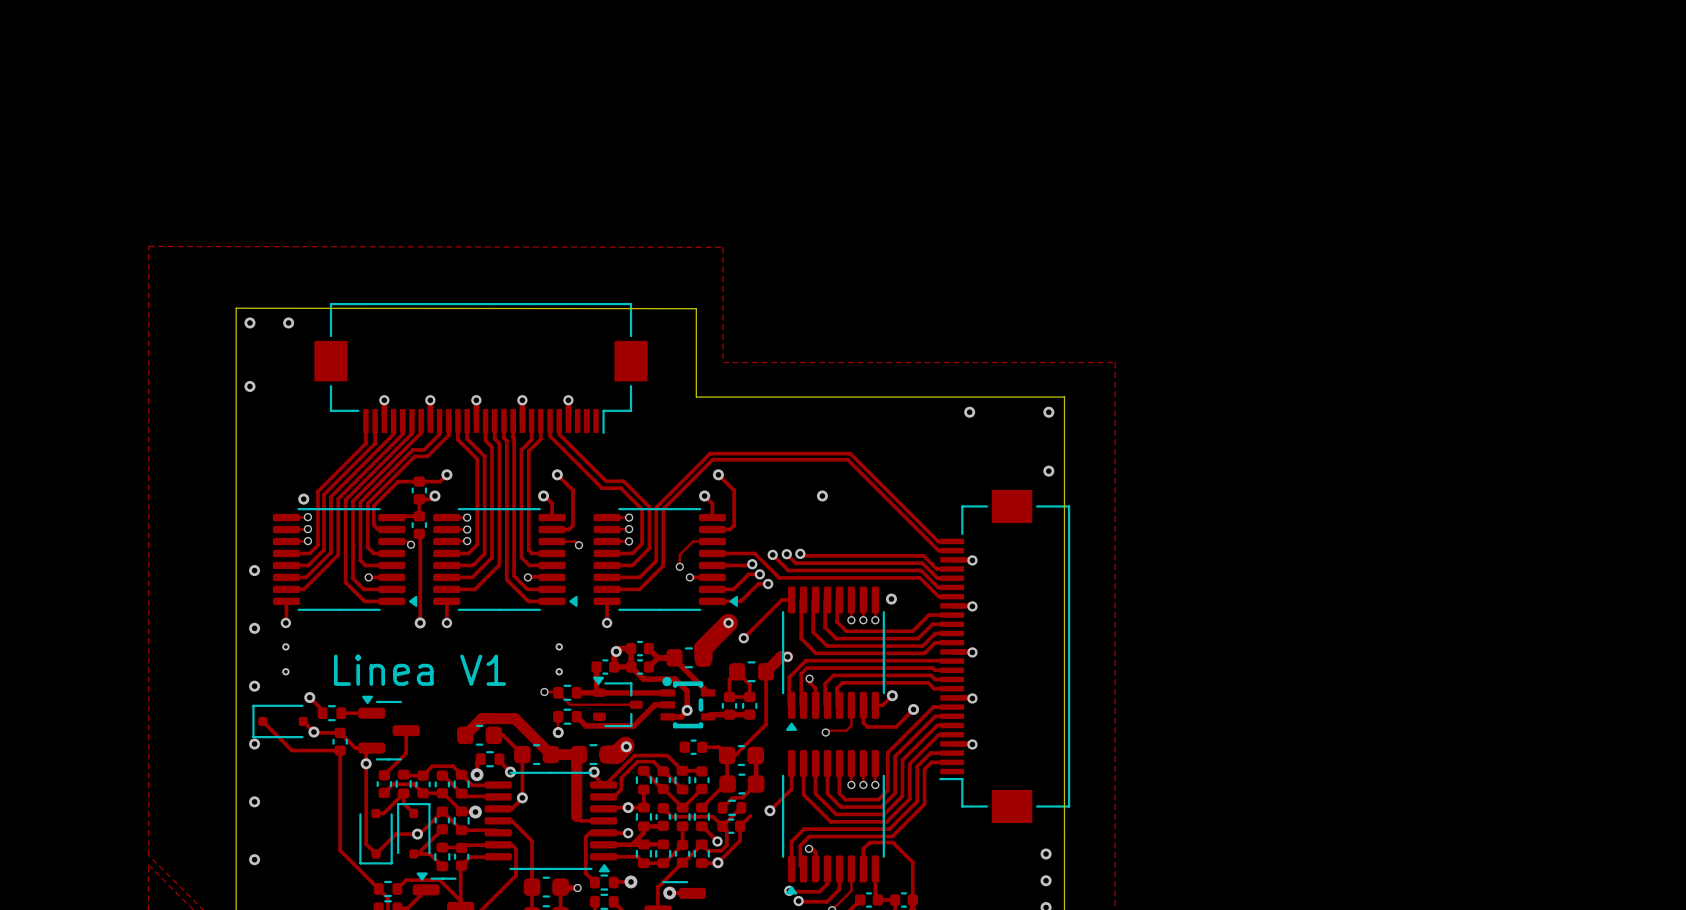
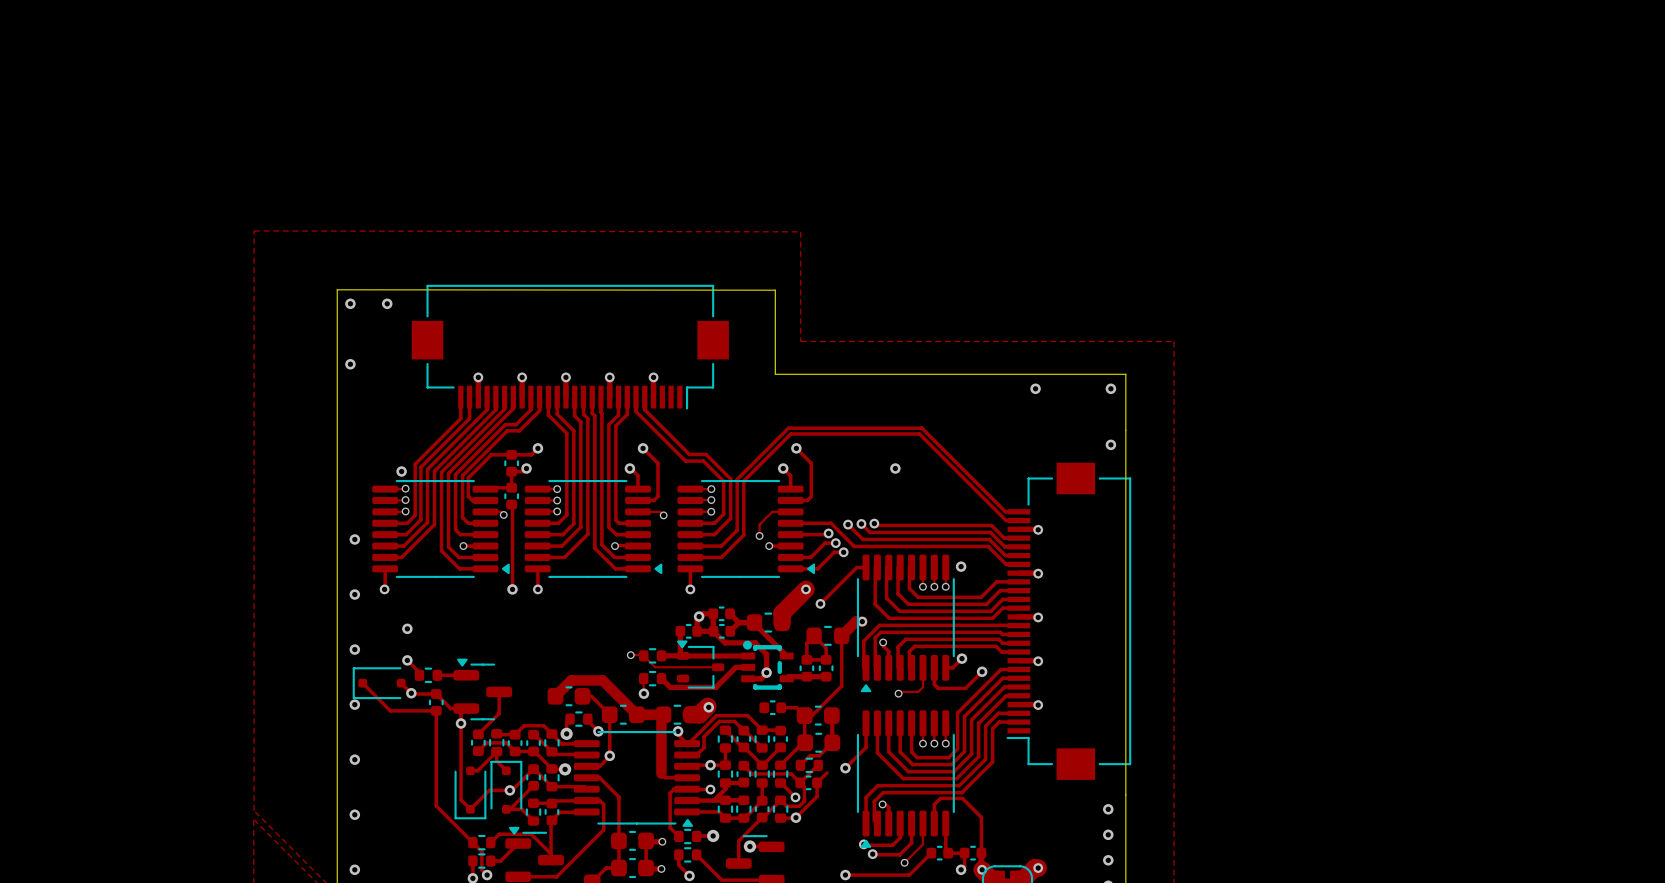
via: (285, 646) -> none
via: (559, 646) -> none
via: none -> (407, 628)
text: Linea V1 (419, 670) -> none
via: (285, 671) -> none
via: (559, 671) -> none

